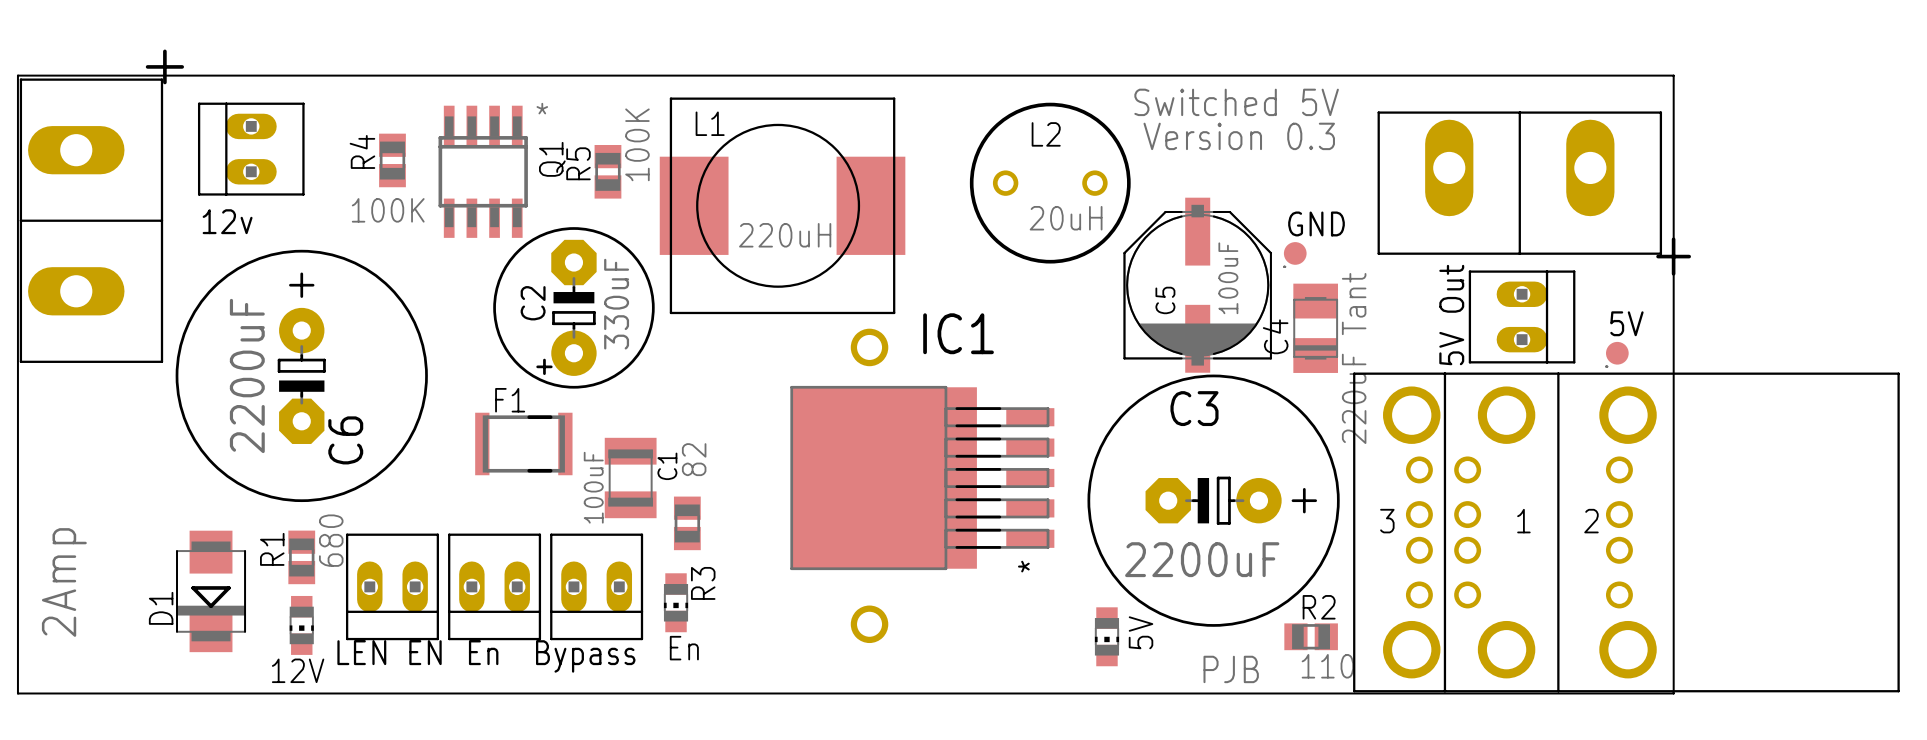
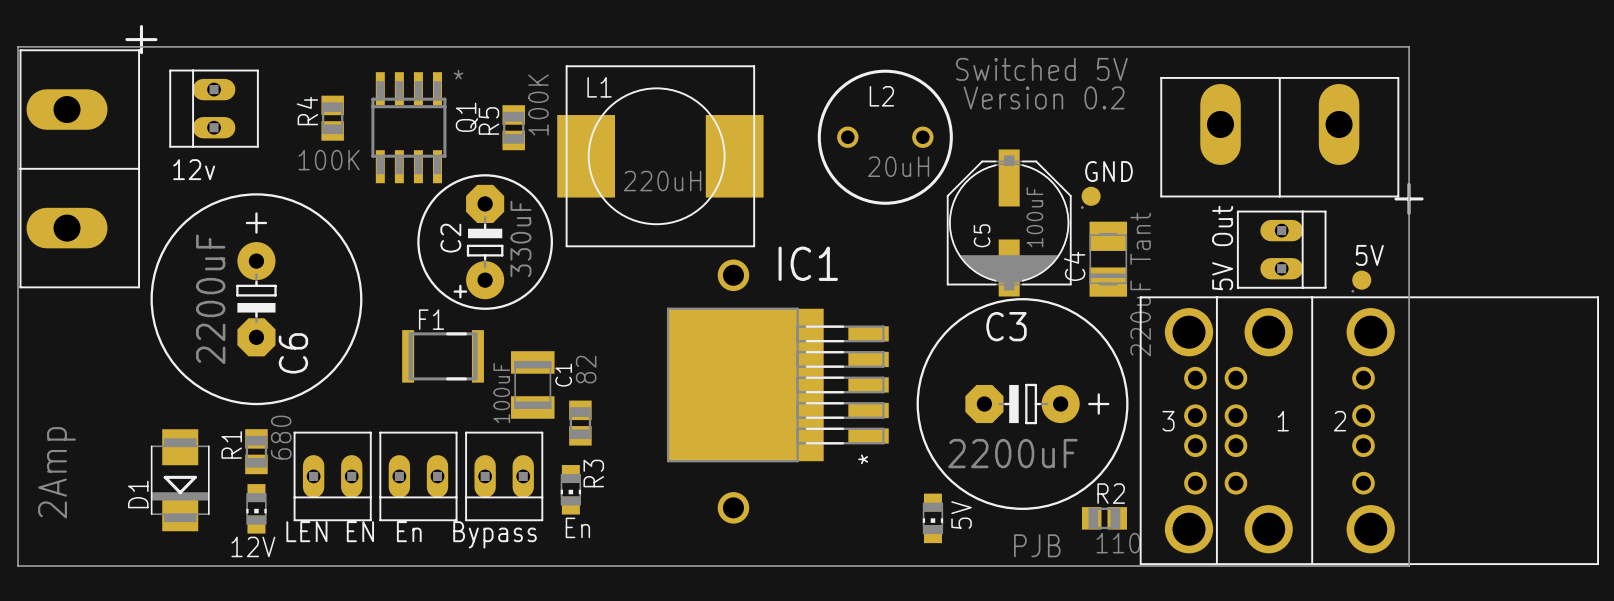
text: Version 0.3 (1239, 136) -> Version 0.2 (1044, 97)

